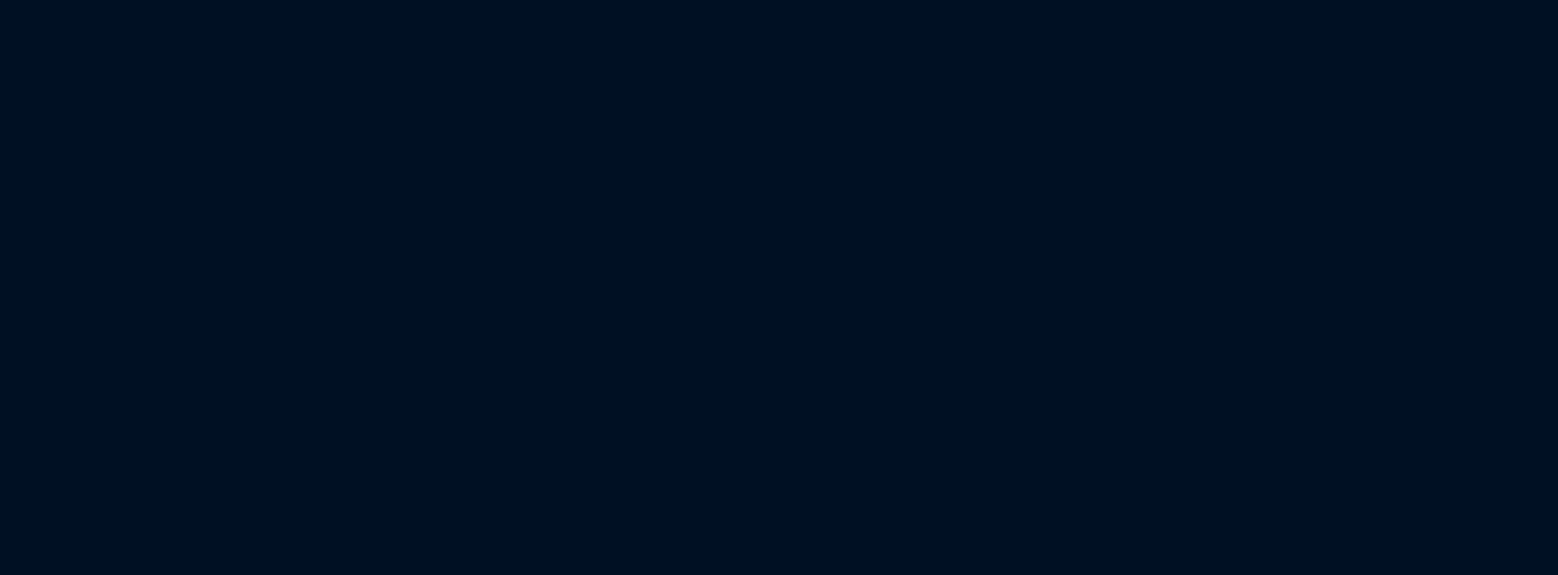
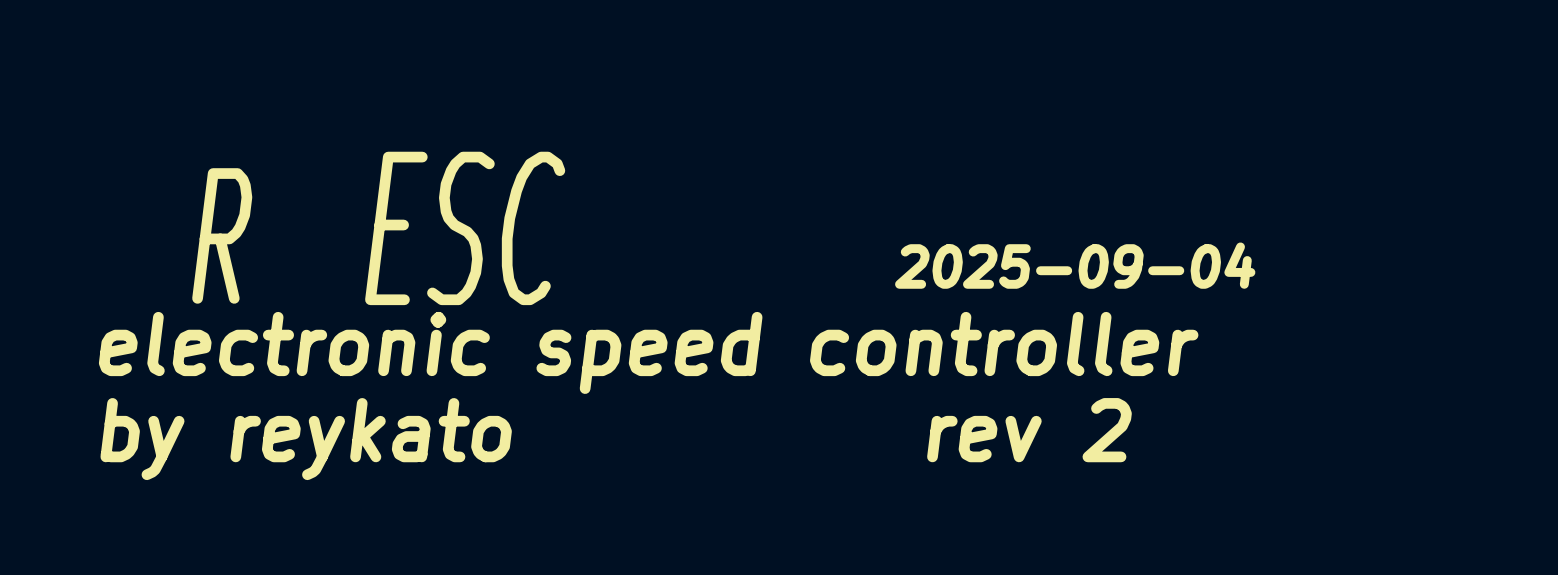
text: none -> ESC (465, 228)
text: none -> R (222, 235)
text: none -> 2025-09-04 (1075, 265)
text: none -> electronic speed controller (648, 352)
text: none -> rev 2 (1029, 430)
text: none -> by reykato (306, 439)

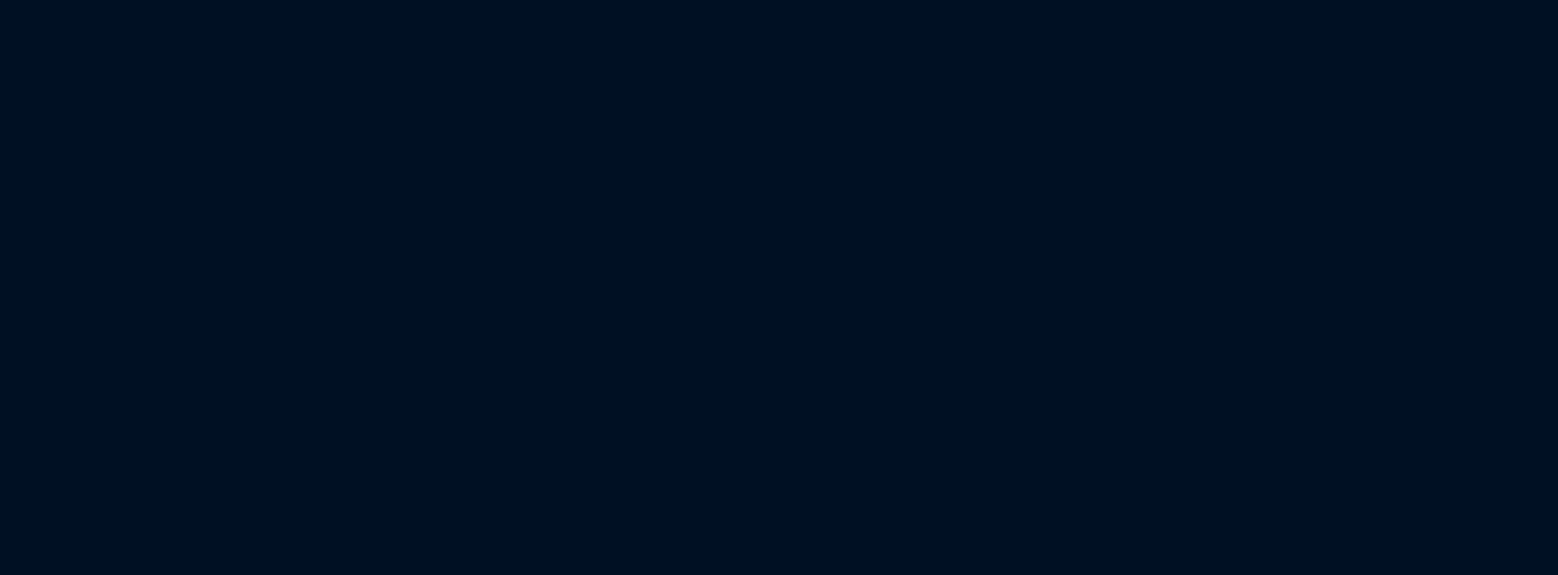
text: ESC (465, 228) -> none
text: R (222, 235) -> none
text: 2025-09-04 (1075, 265) -> none
text: electronic speed controller (648, 352) -> none
text: rev 2 (1029, 430) -> none
text: by reykato (306, 439) -> none

